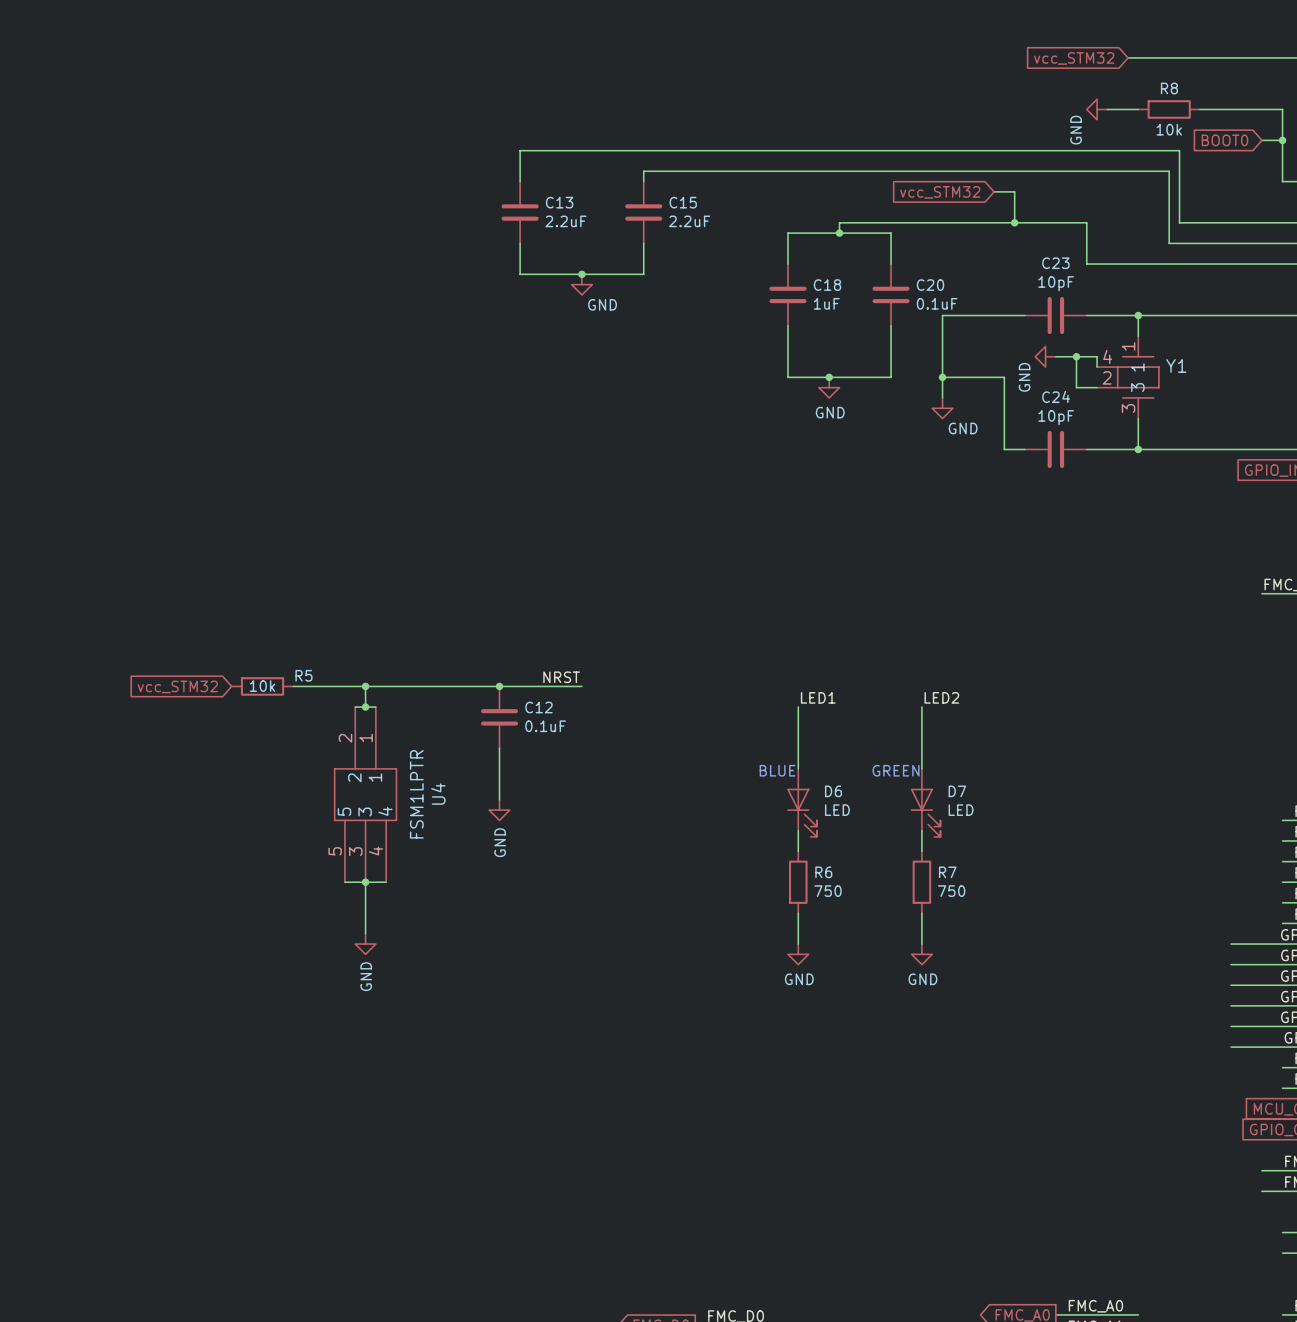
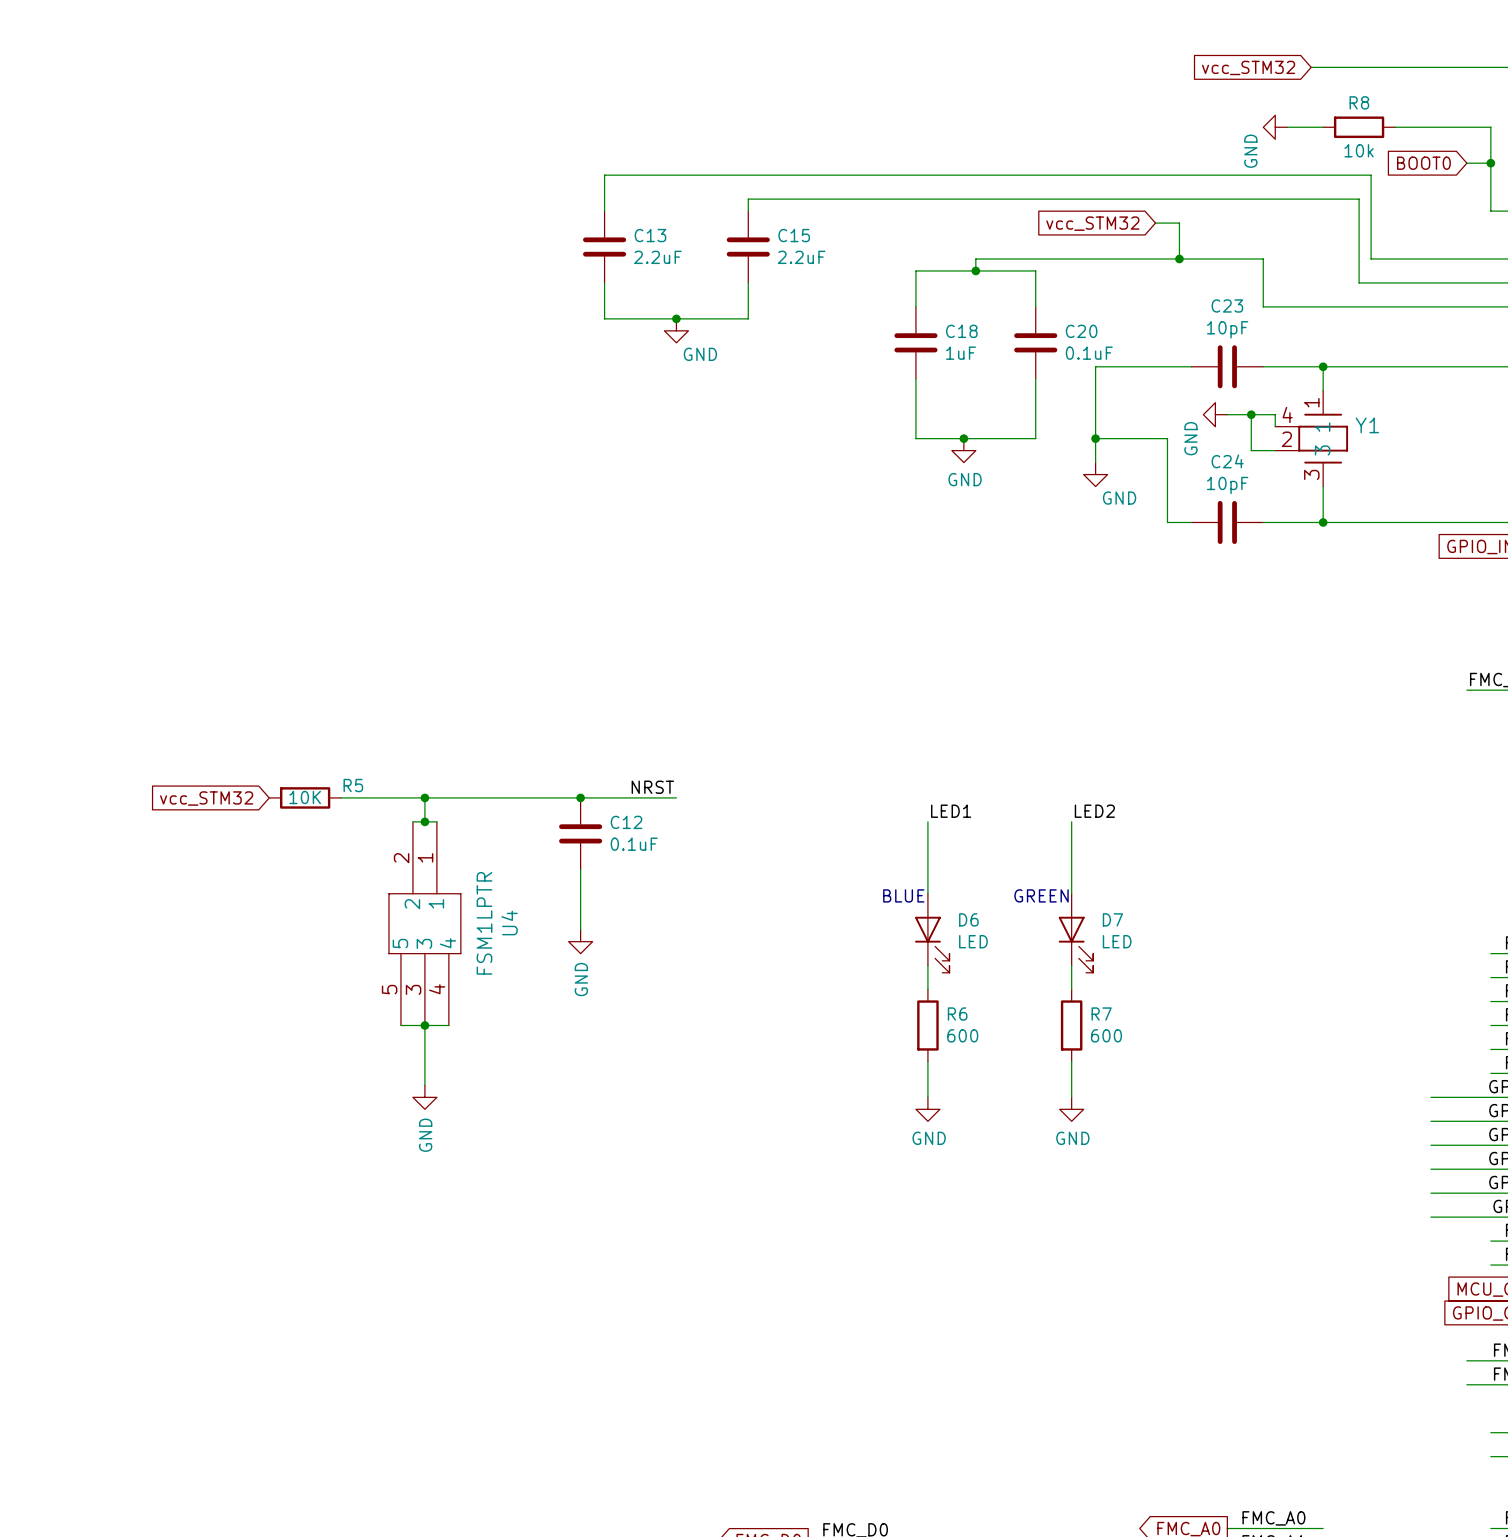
R5 value: 10k (262, 686) -> 10K (305, 797)
R6 value: 750 (828, 891) -> 600 (962, 1035)
R7 value: 750 (951, 891) -> 600 (1106, 1035)

